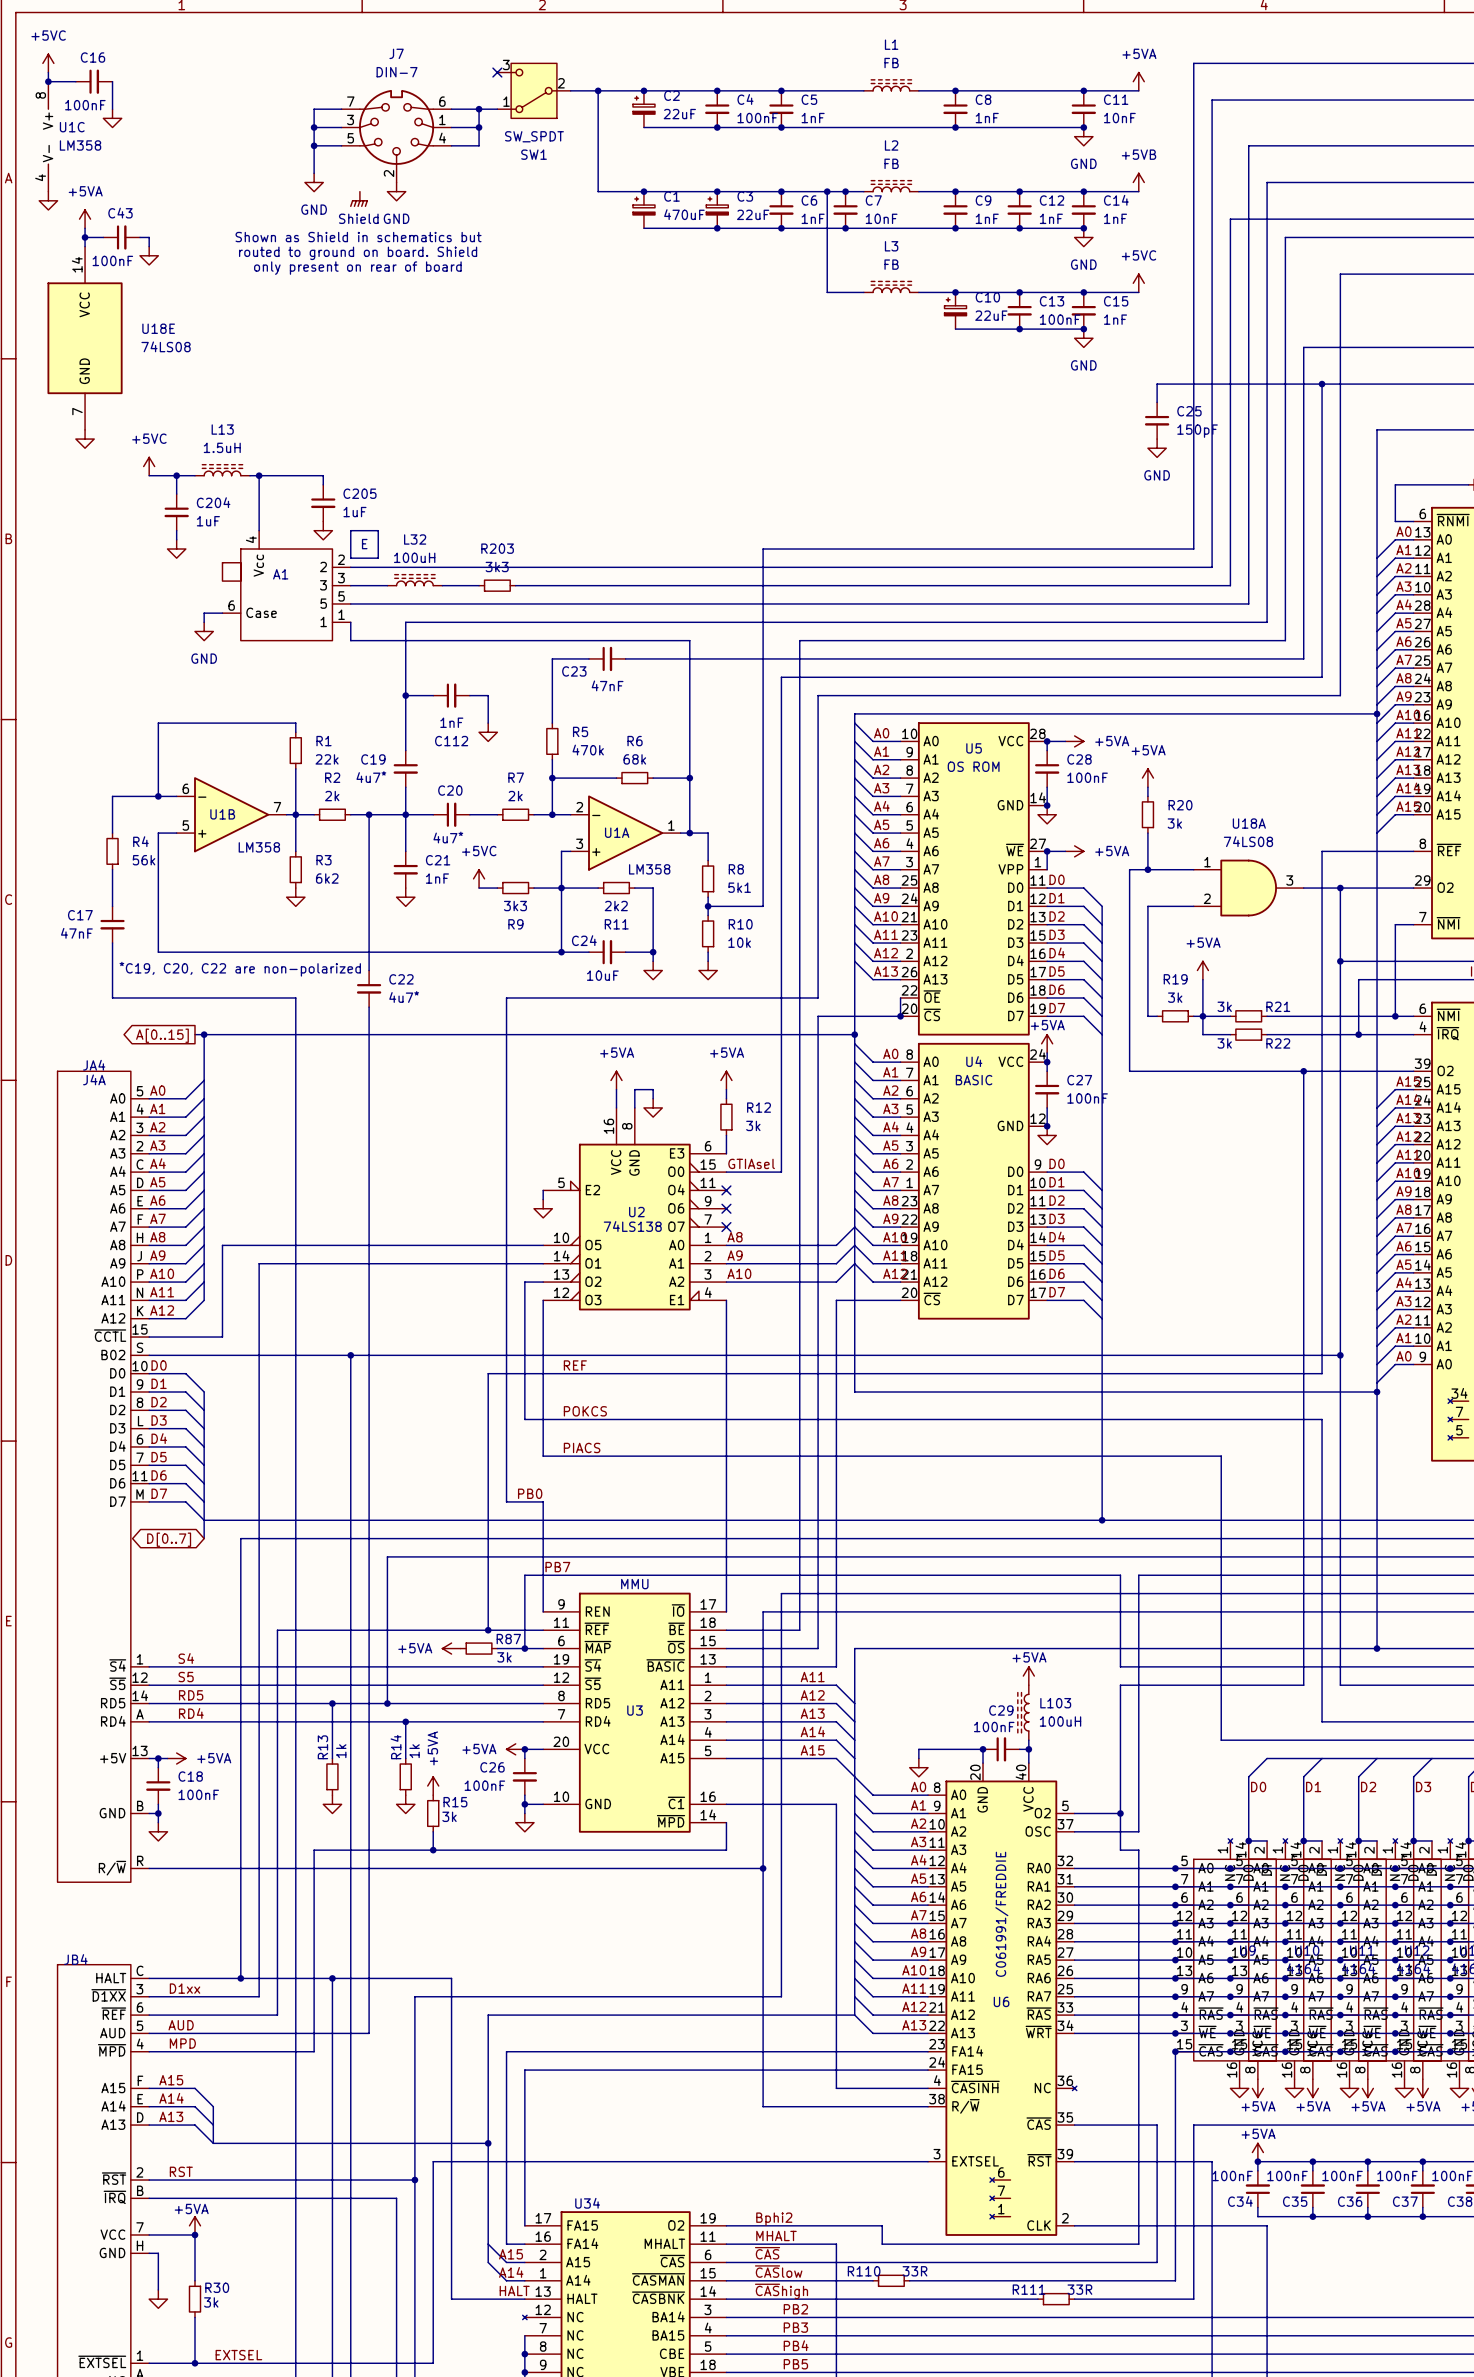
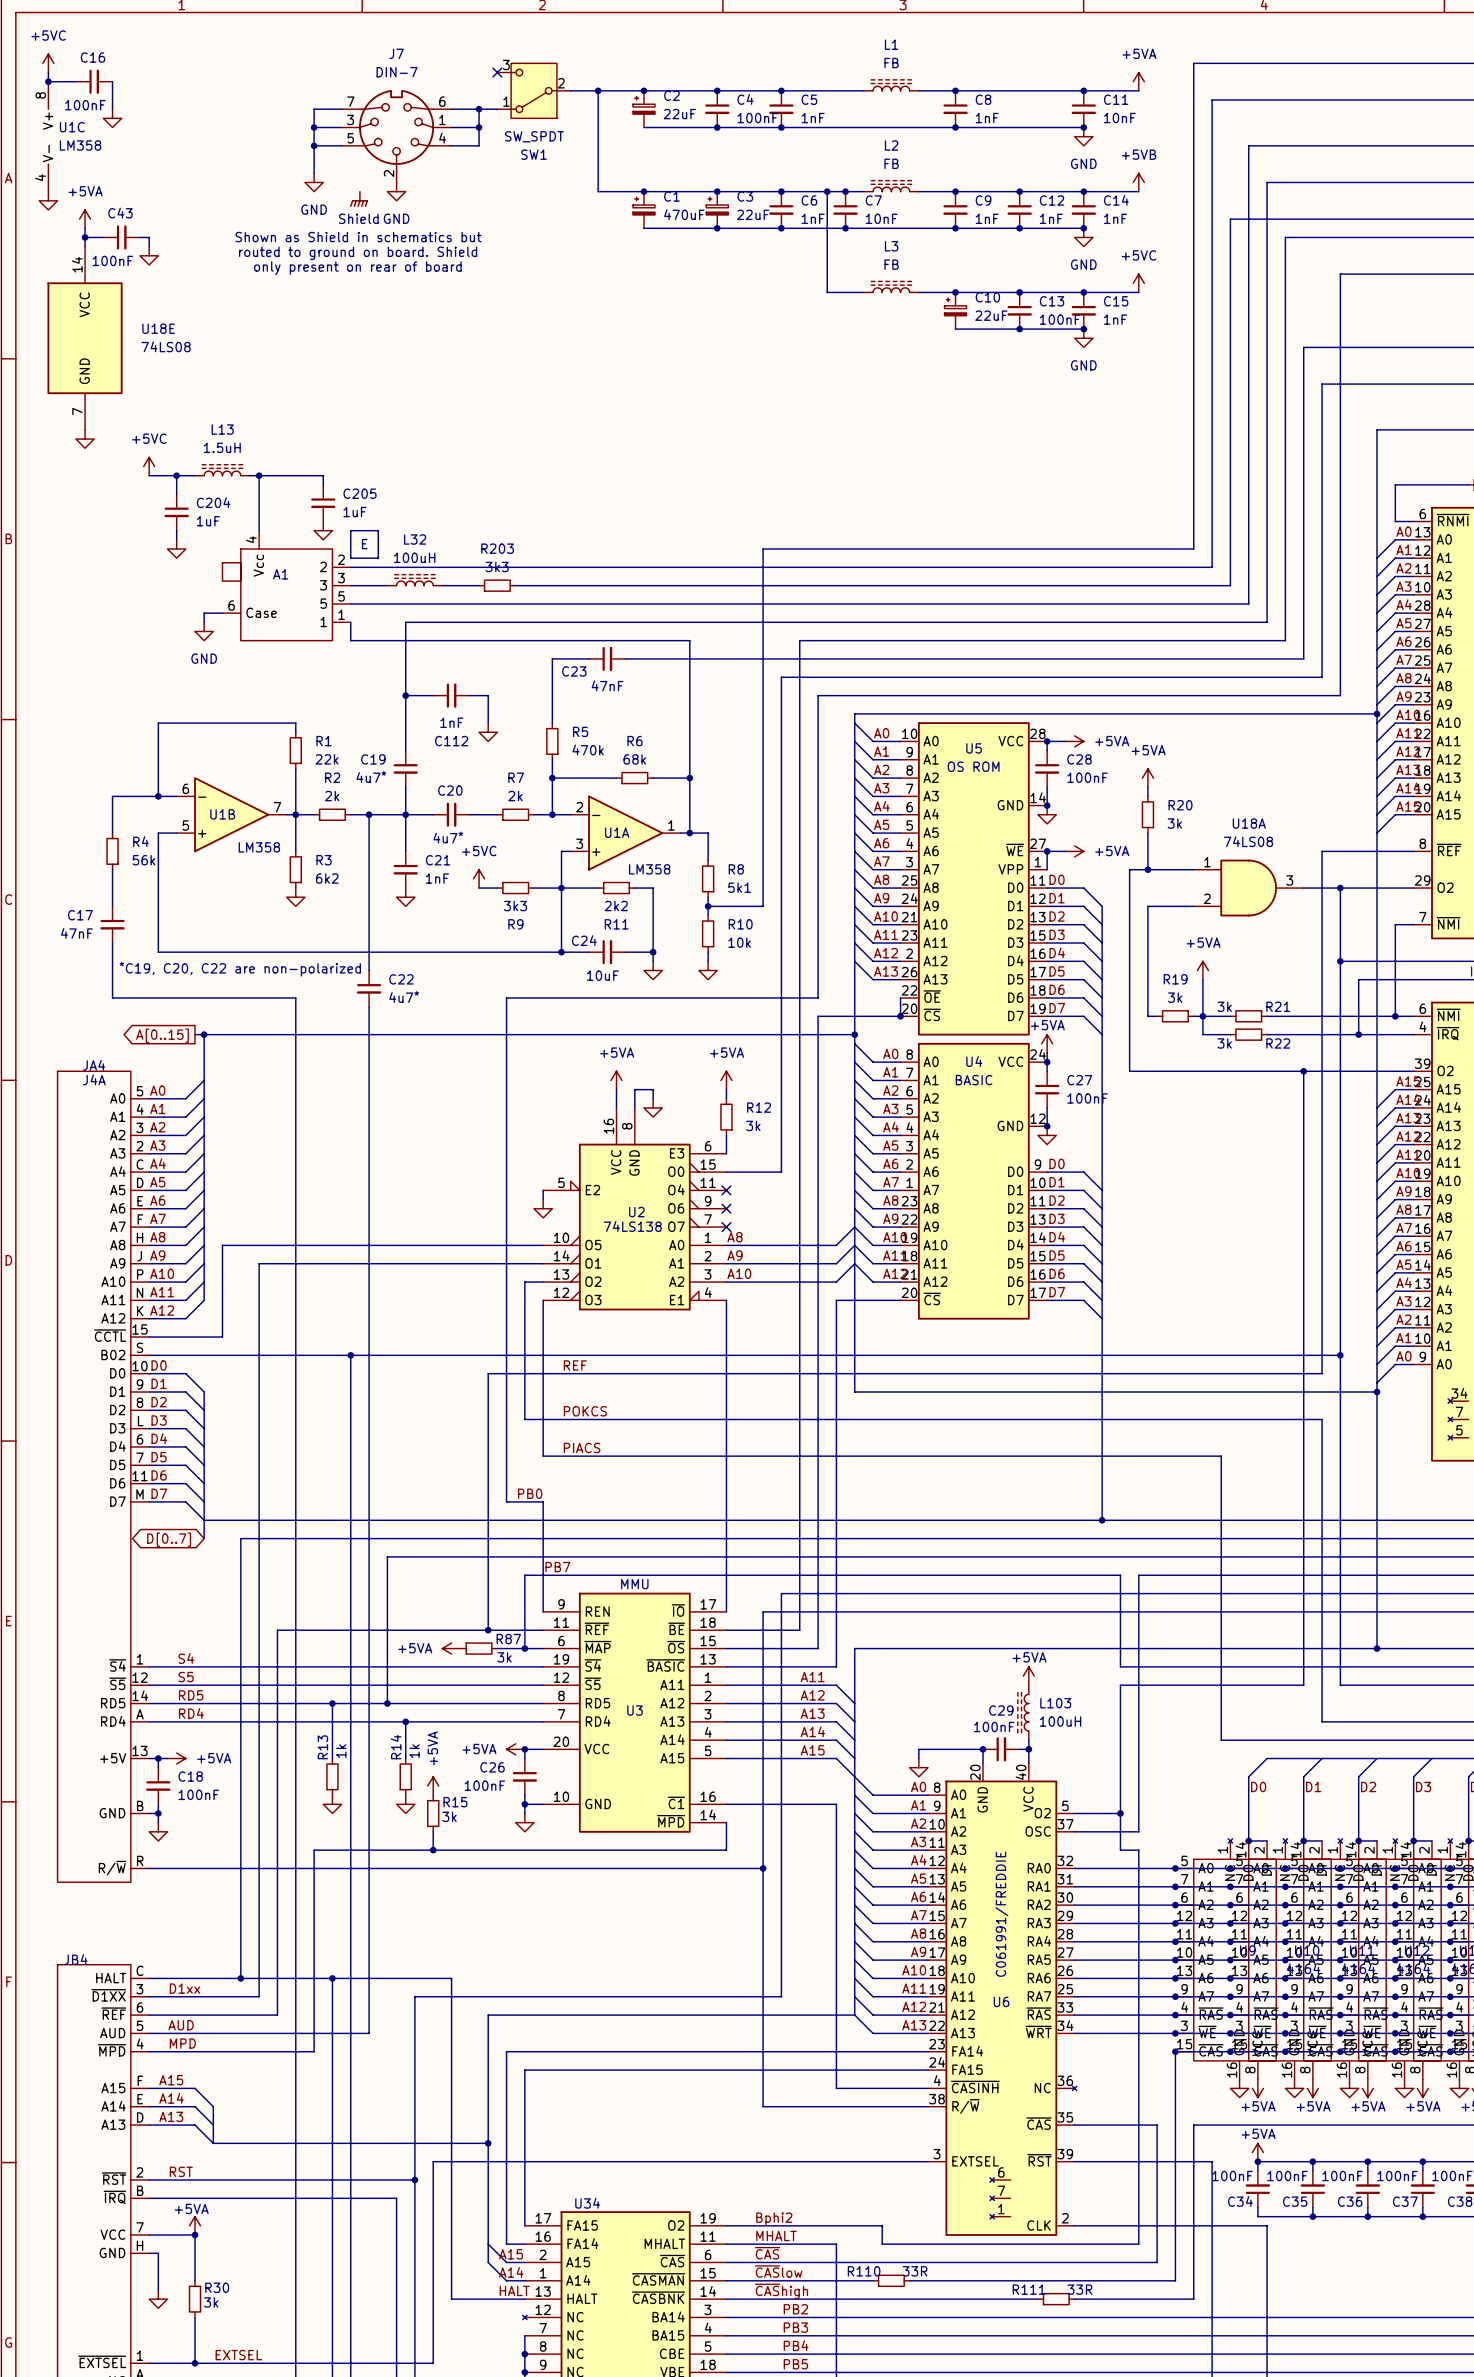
wire: (1322, 384) (1157, 384) (1157, 402) -> none
junction: (1322, 384) -> none
C25: 150pF (1157, 420) -> none
power symbol: GND (1157, 448) -> none
label: GTIAsel (751, 1163) -> none

